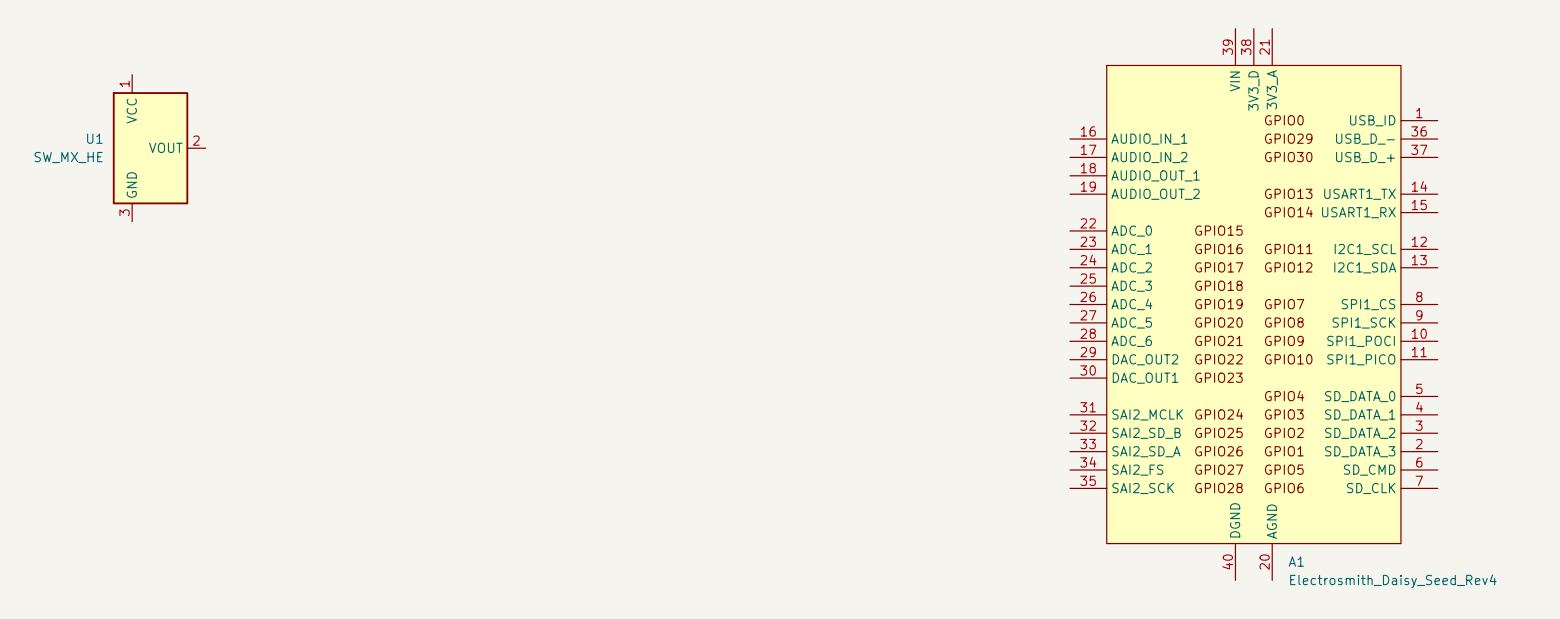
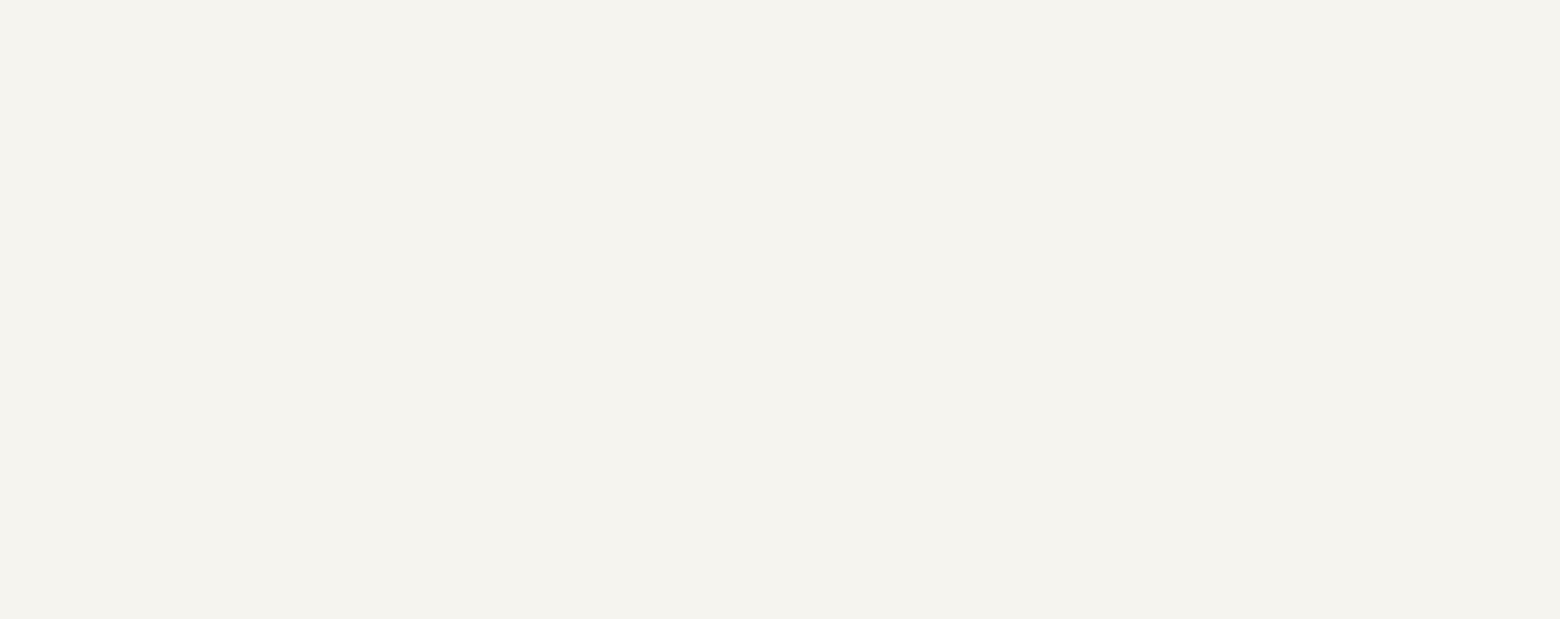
U1: SW_MX_HE (159, 148) -> none
A1: Electrosmith_Daisy_Seed_Rev4 (1253, 304) -> none

